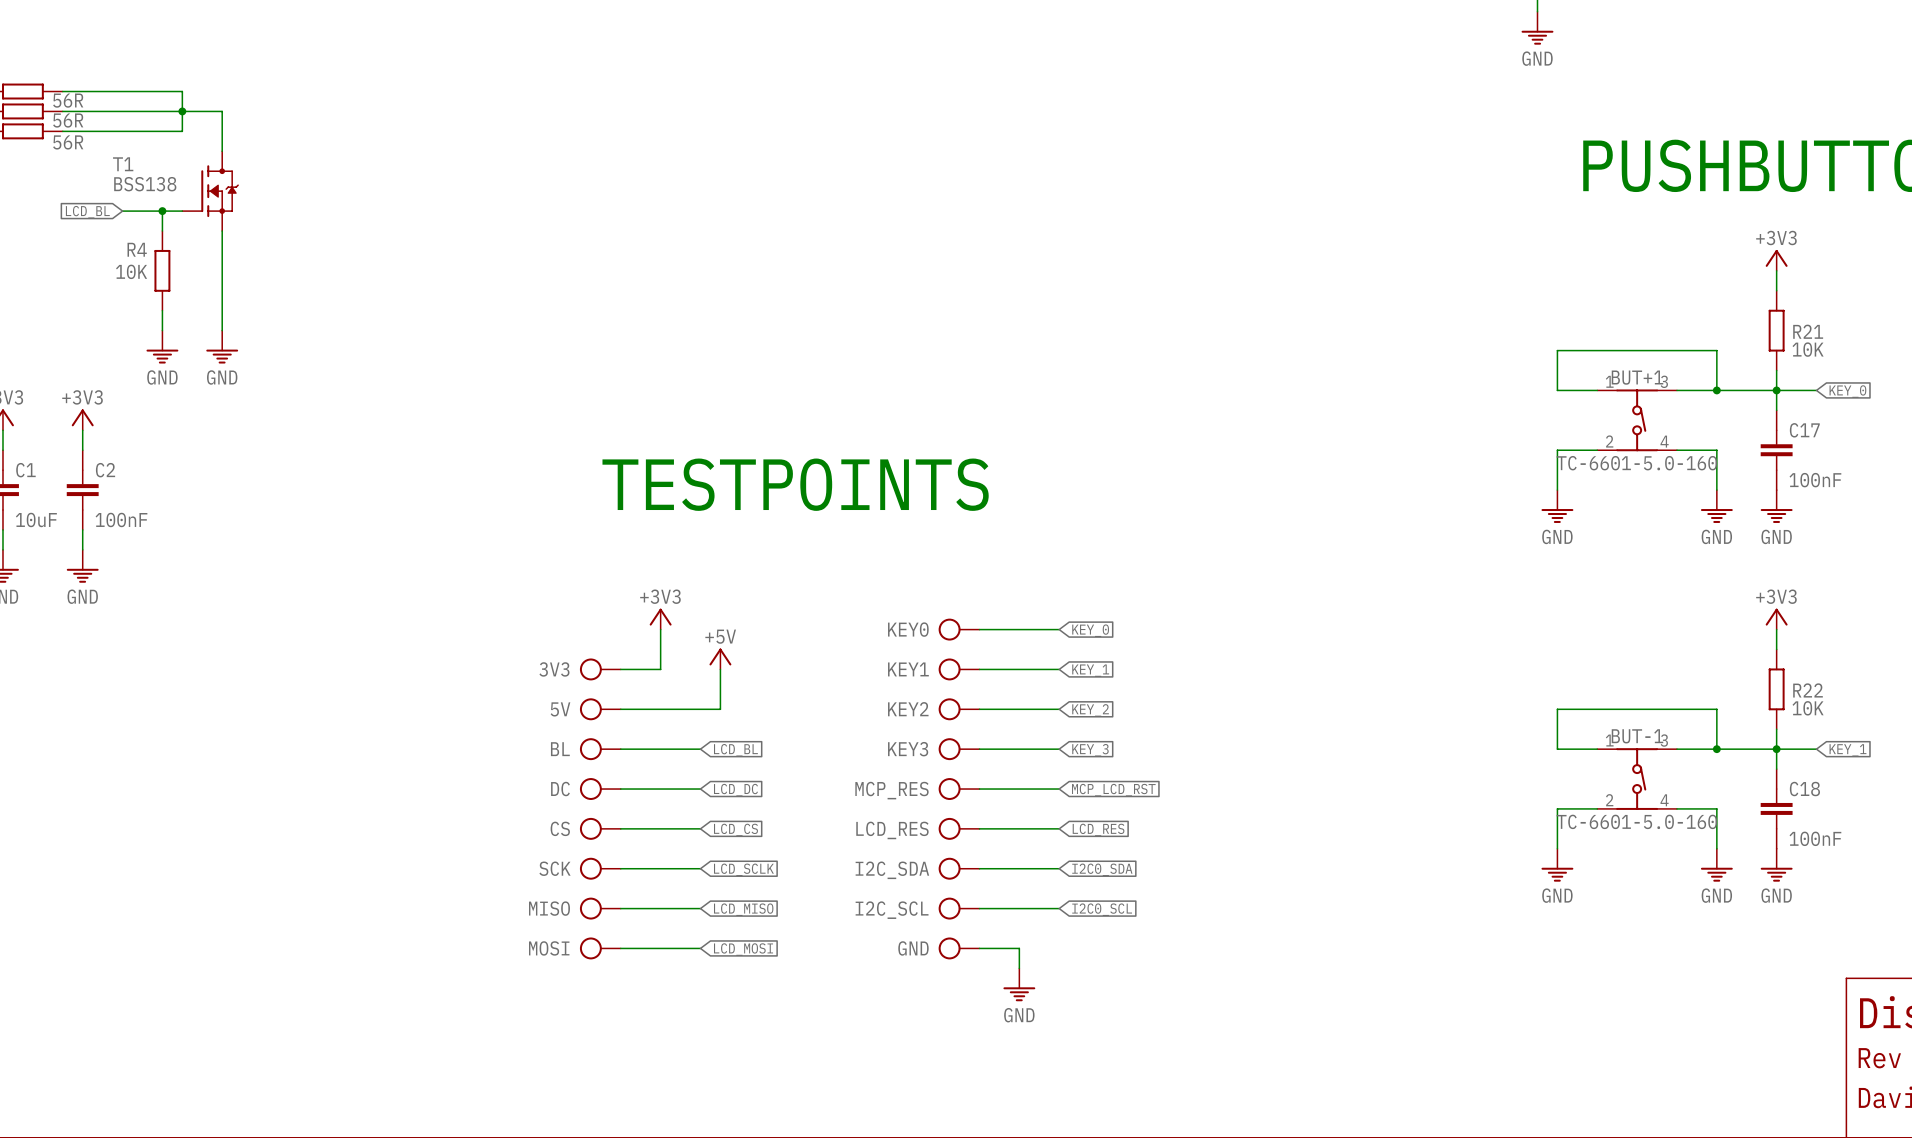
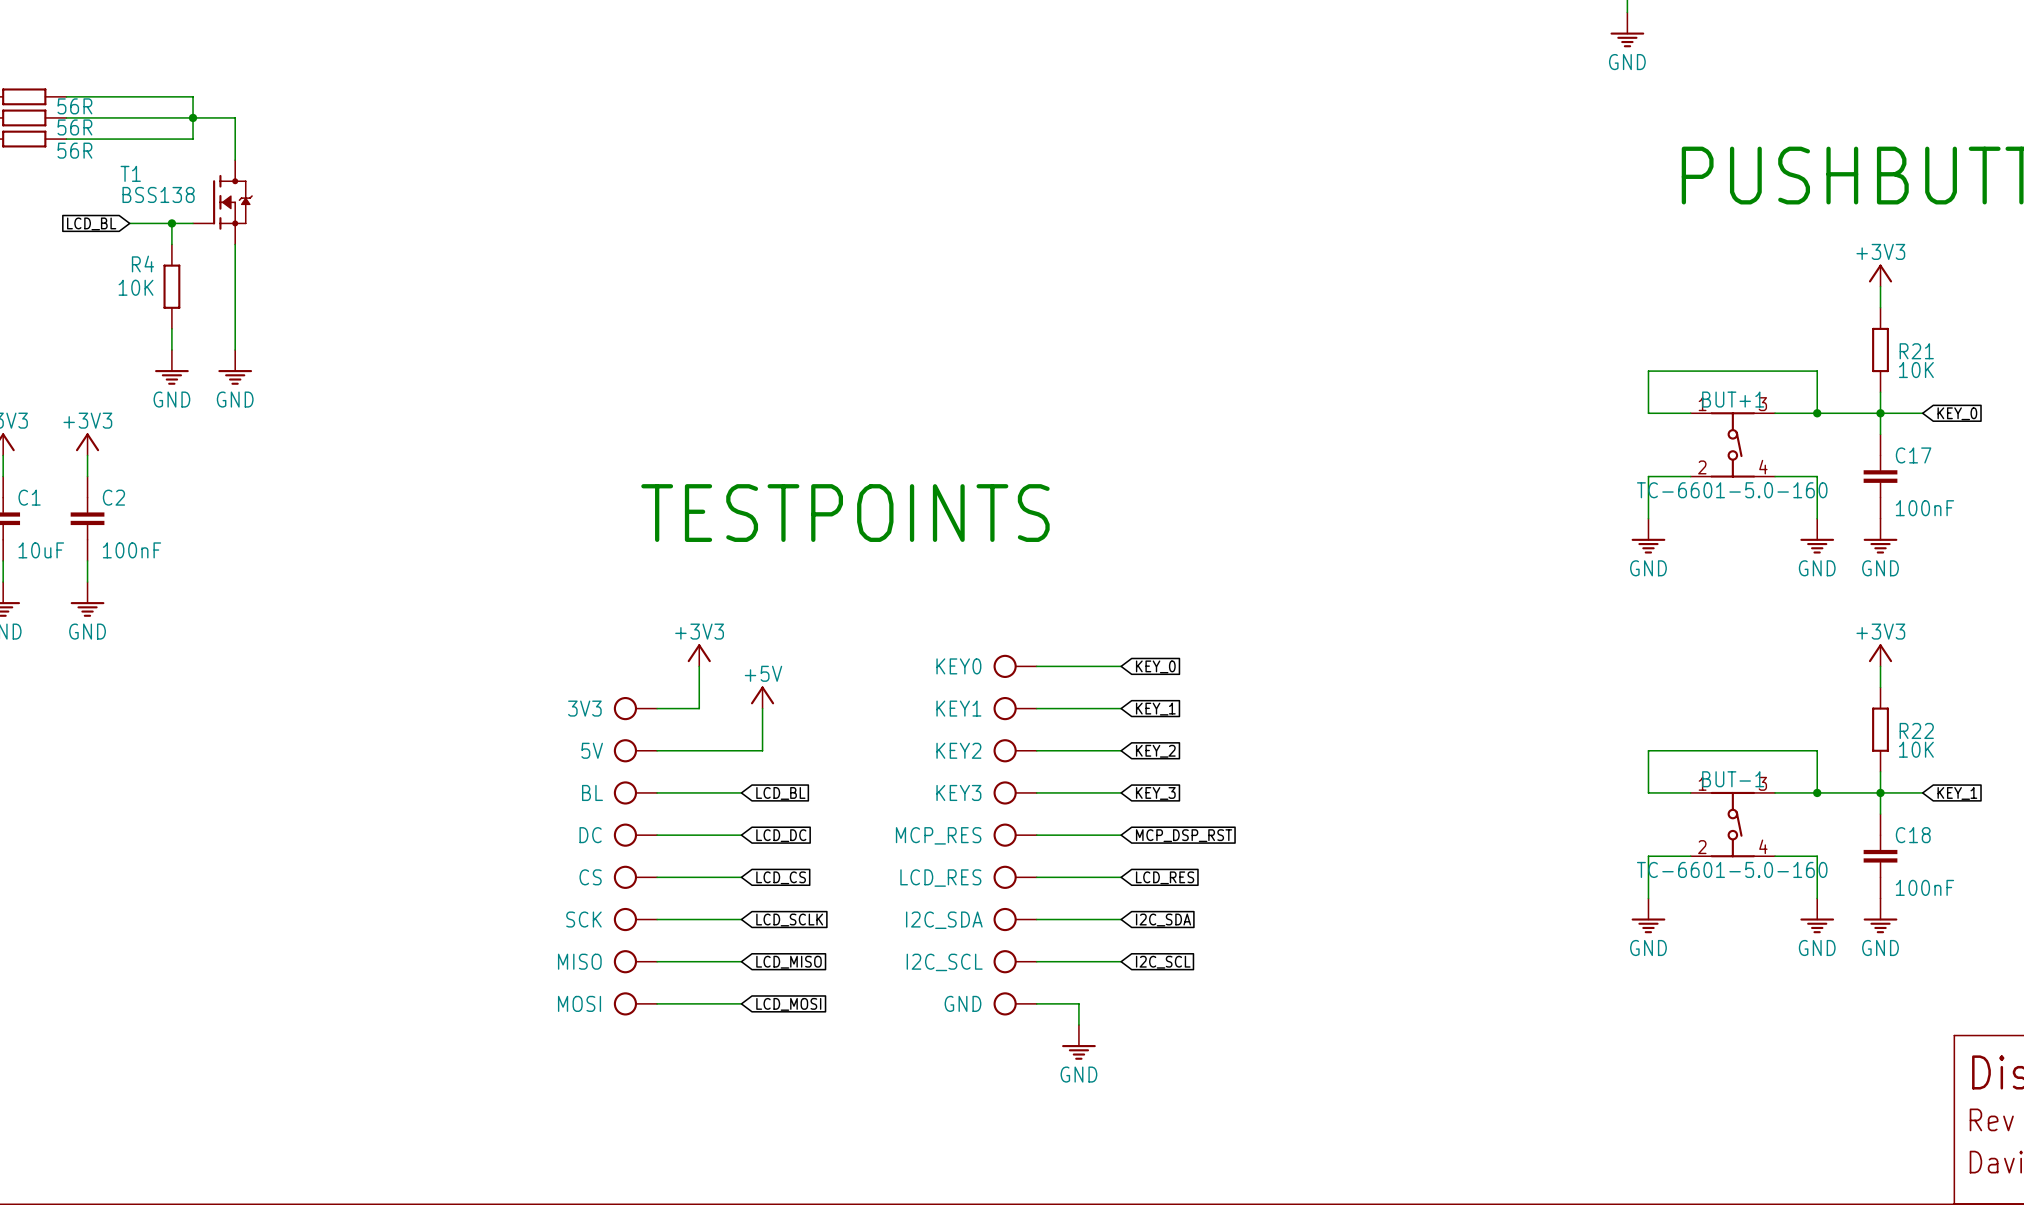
global label: MCP_LCD_RST (1113, 790) -> MCP_DSP_RST (1184, 835)
global label: I2C0_SDA (1102, 869) -> I2C_SDA (1163, 920)
global label: I2C0_SCL (1102, 909) -> I2C_SCL (1163, 962)

